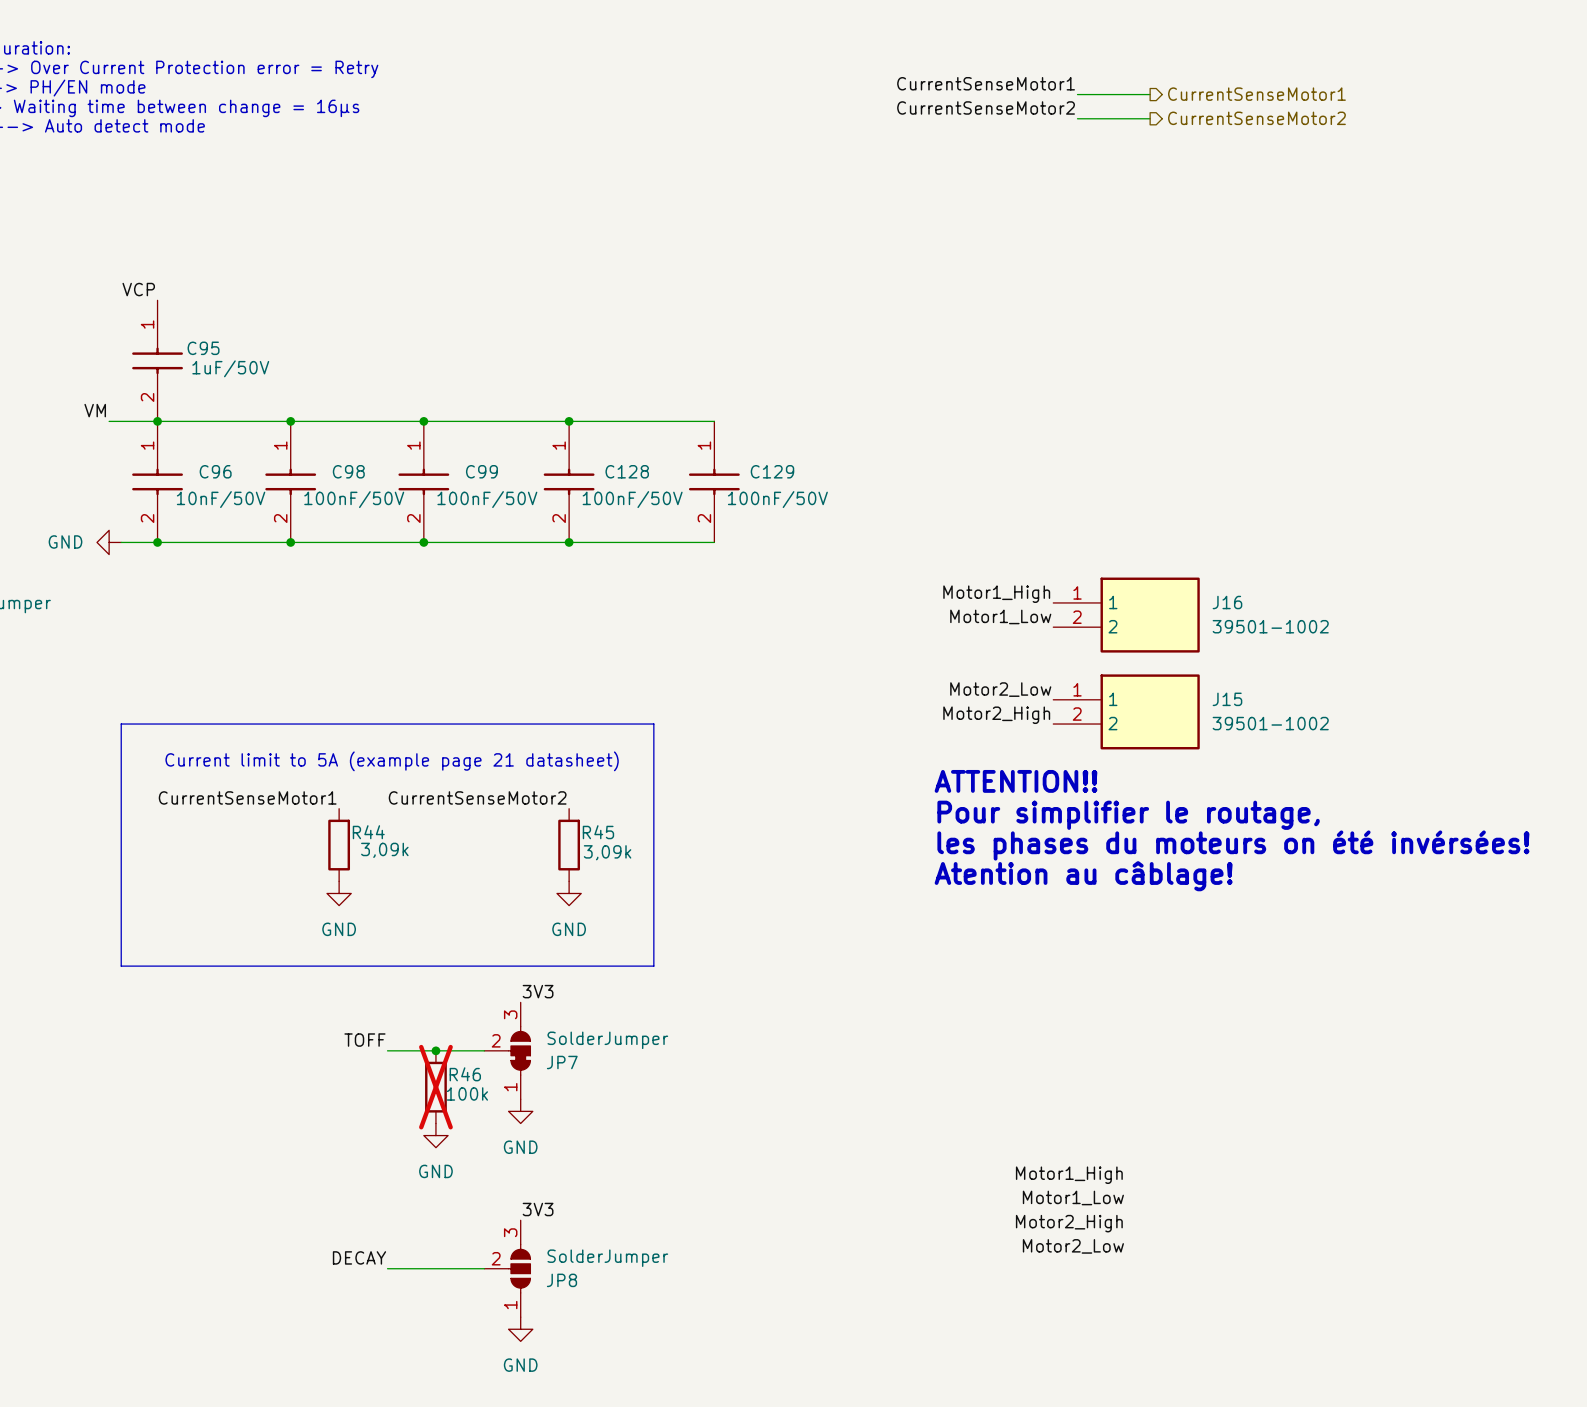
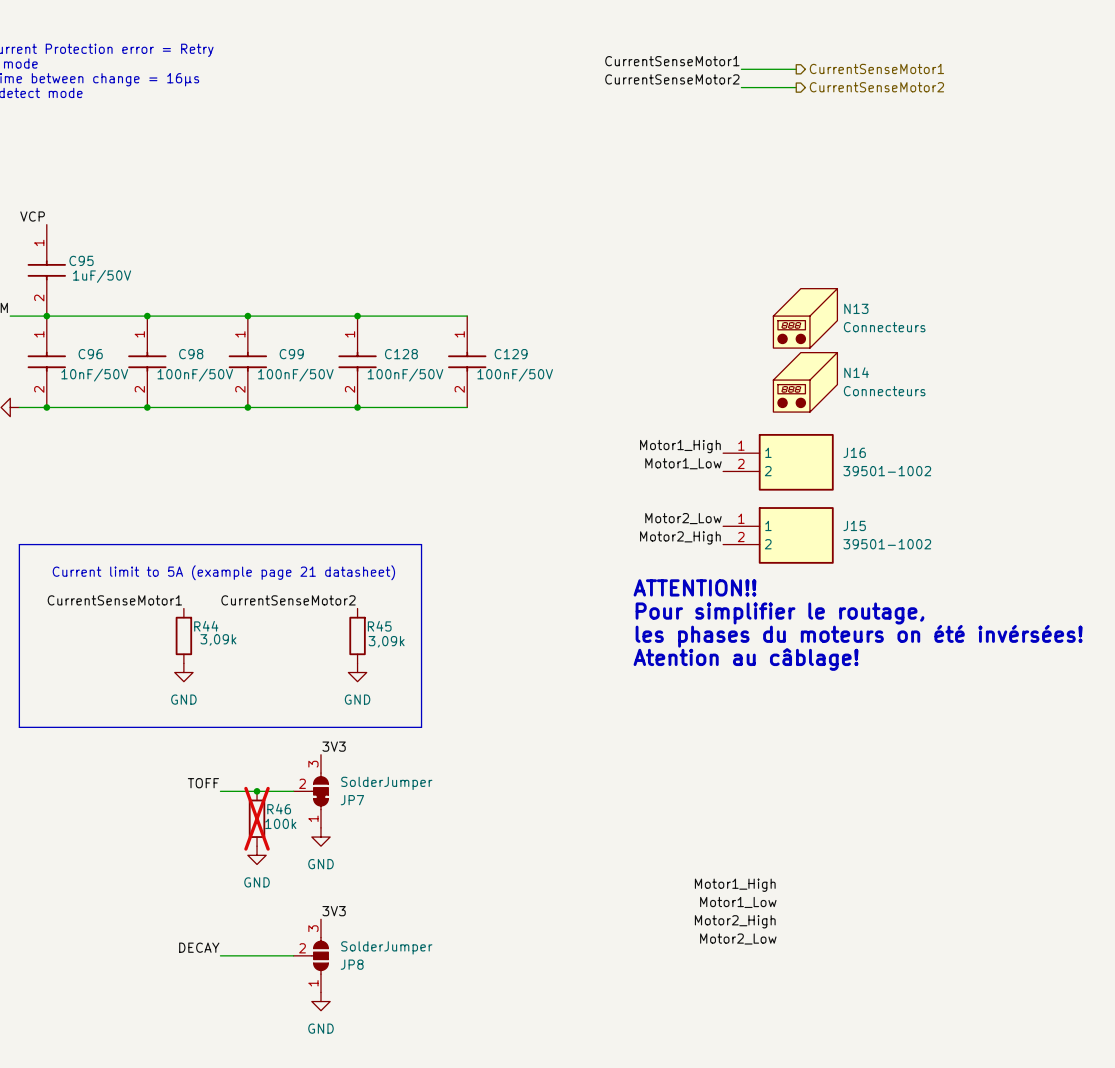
N13: none -> Connecteurs (805, 318)
N14: none -> Connecteurs (805, 382)

